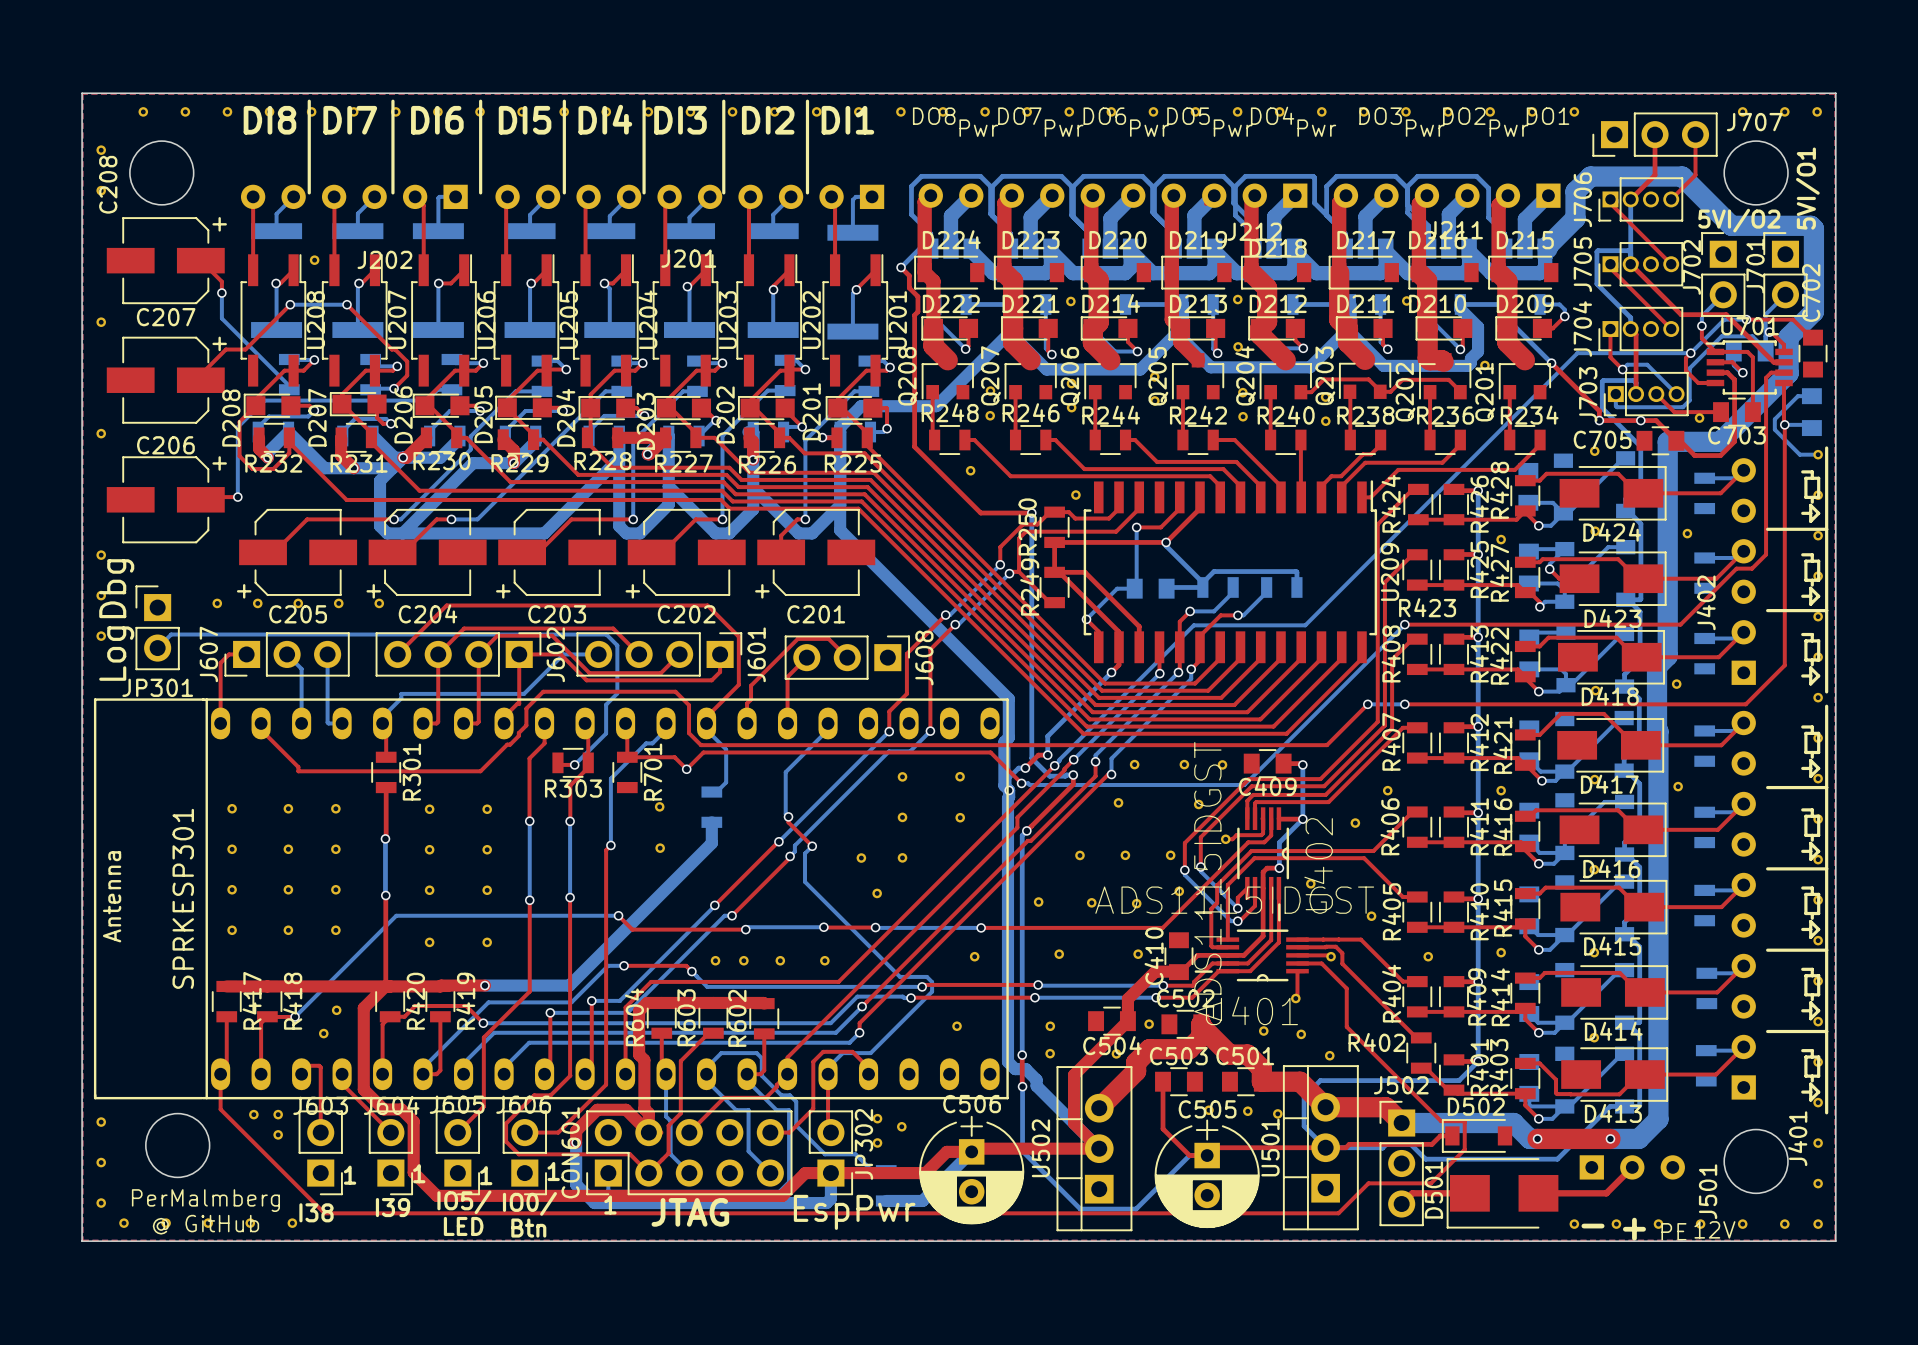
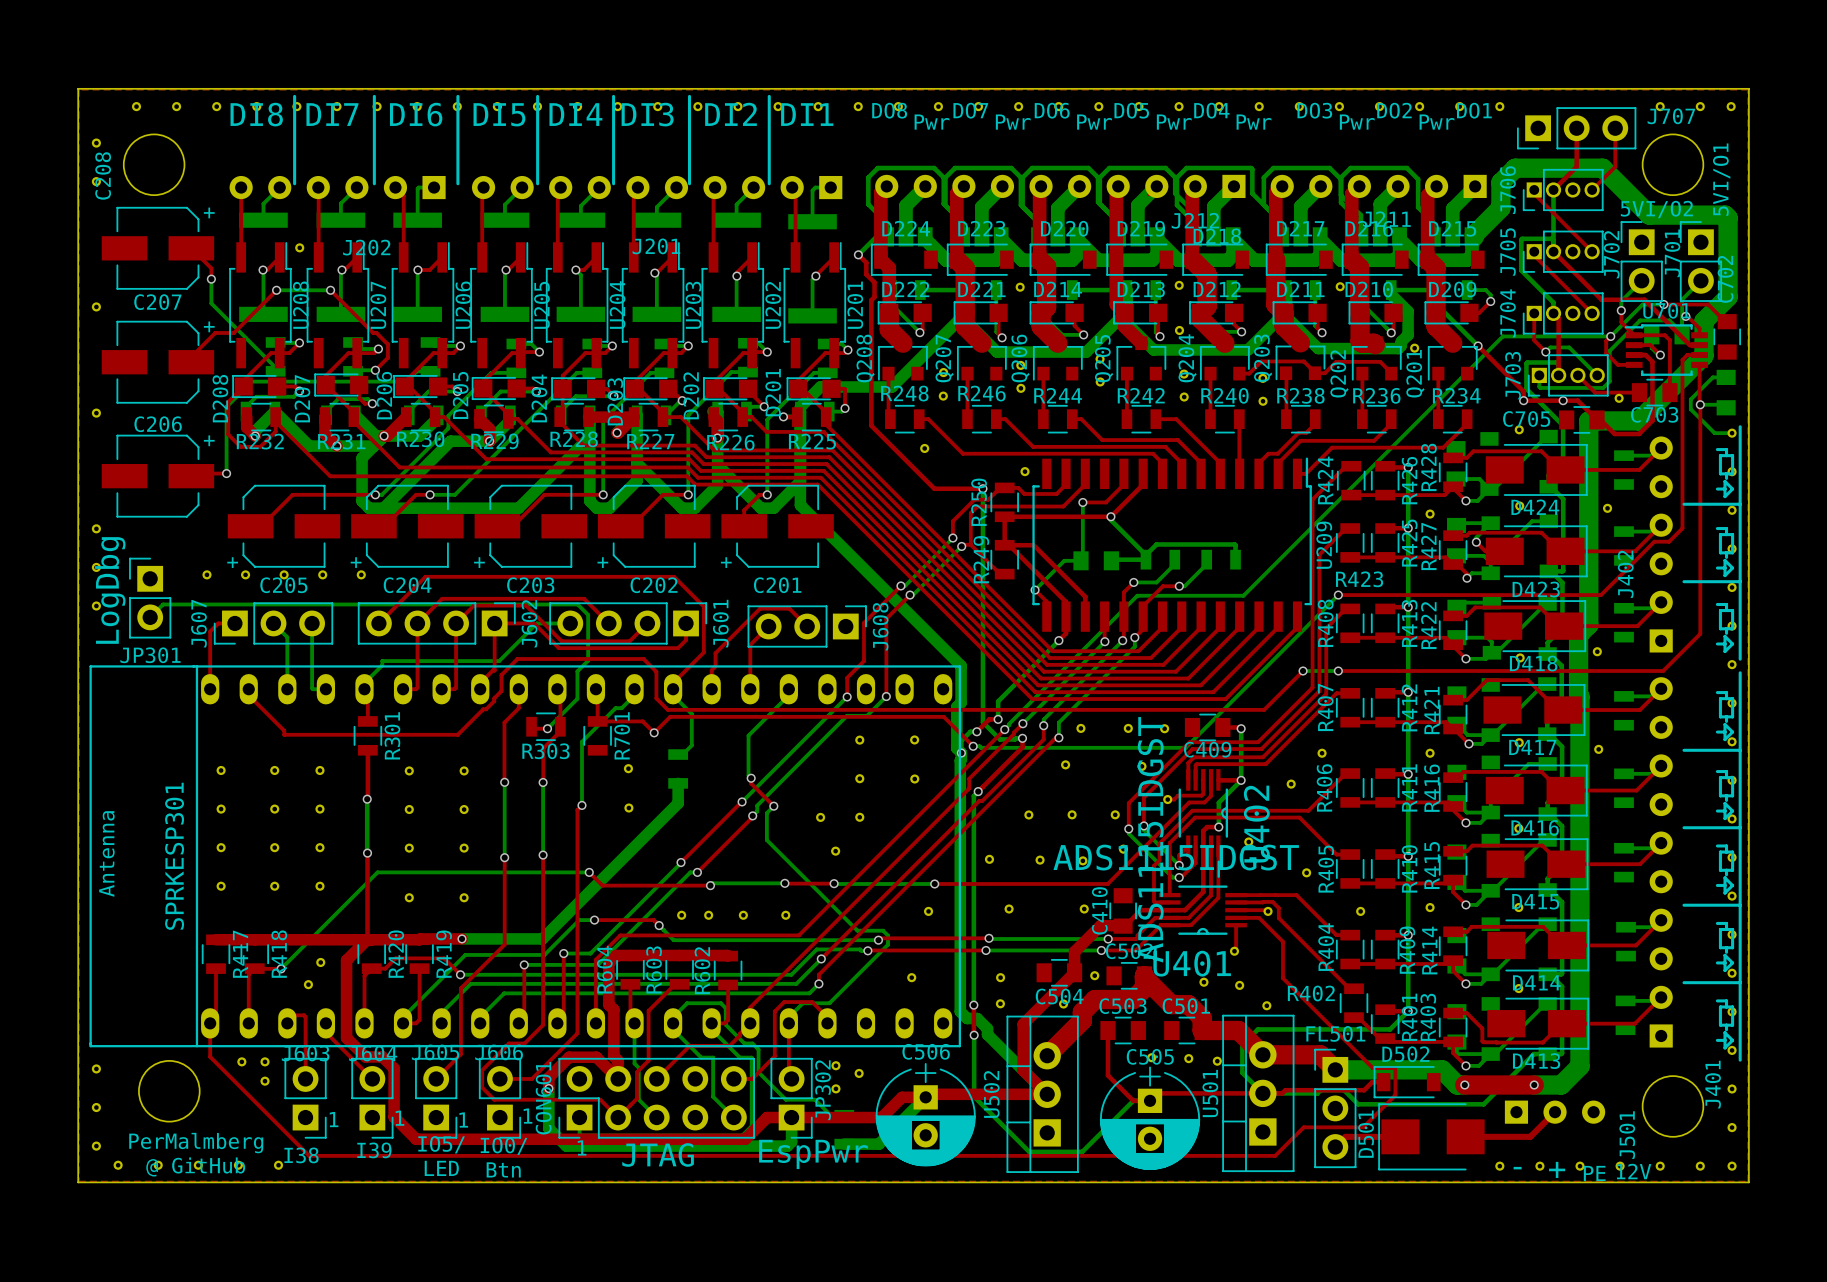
J502 name: J502 (1401, 1085) -> FL501 (1335, 1033)

